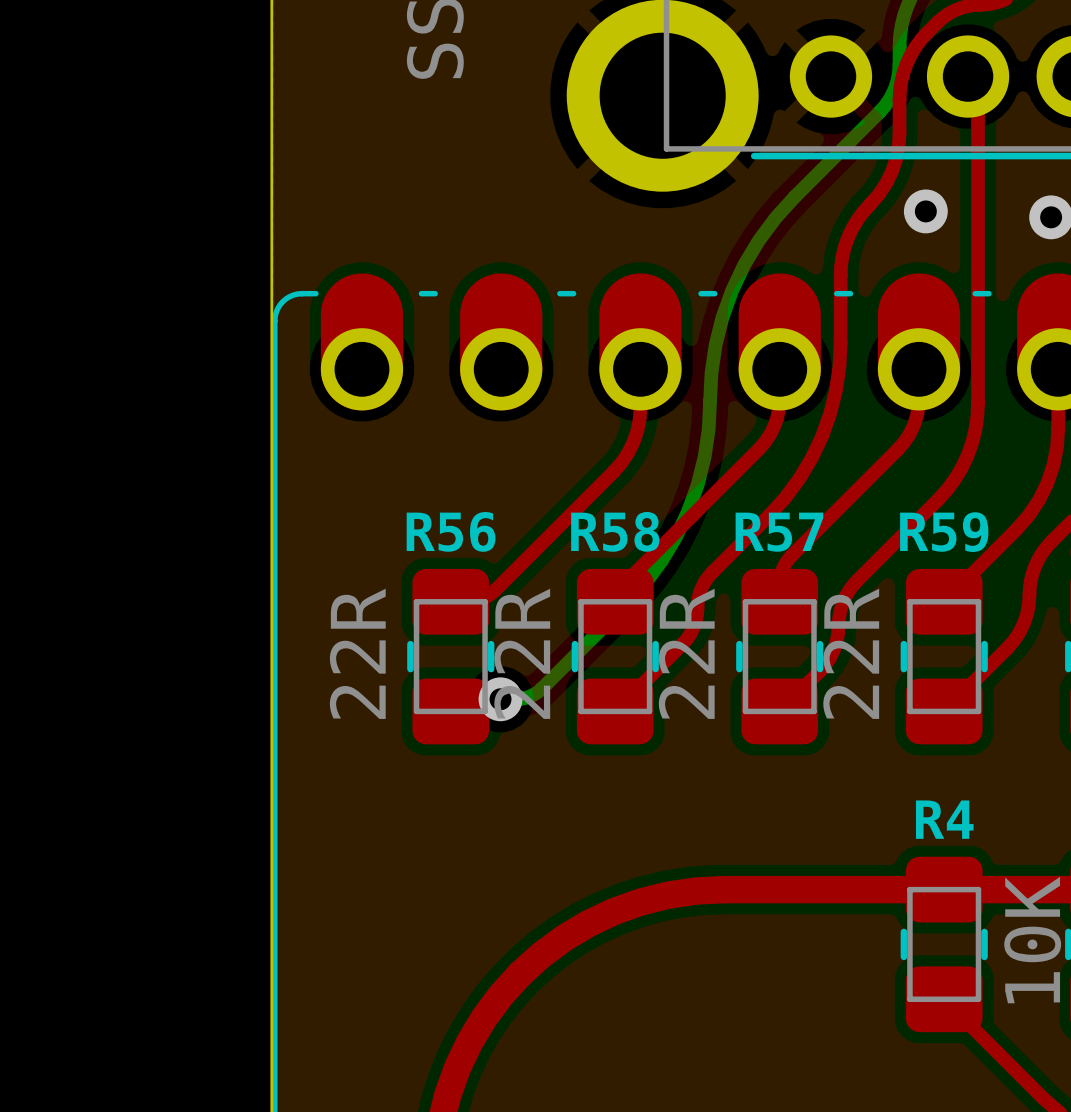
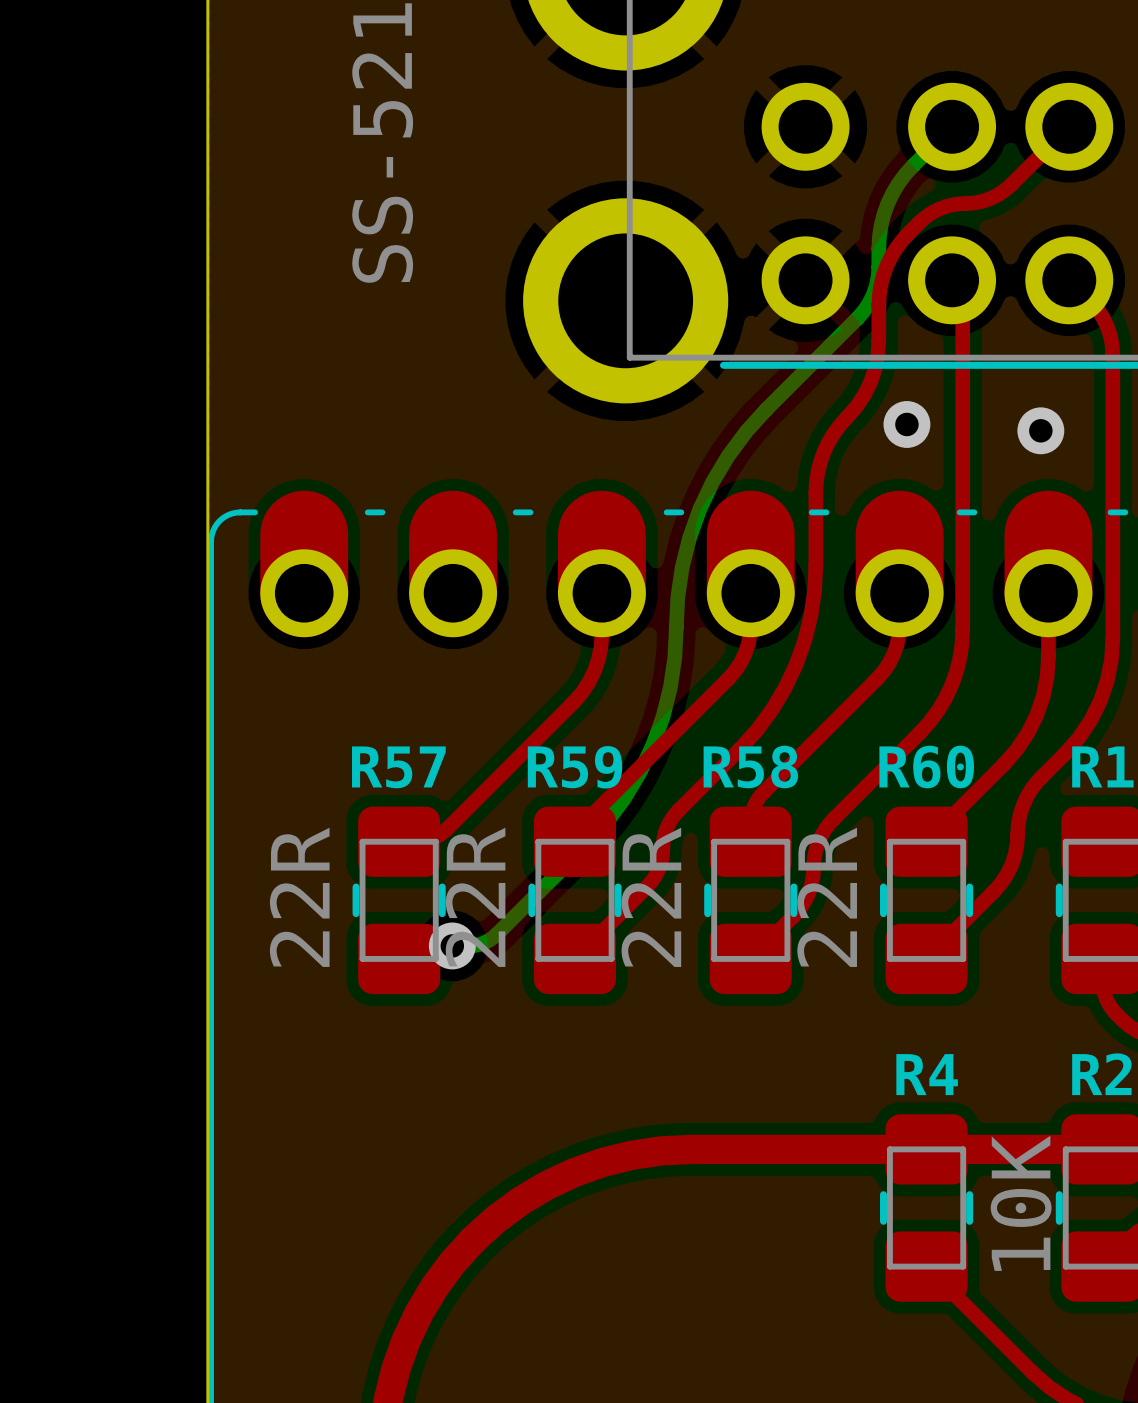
R56 name: R56 (451, 531) -> R57 (398, 767)
R58 name: R58 (615, 531) -> R59 (574, 767)
R57 name: R57 (779, 532) -> R58 (750, 766)
R59 name: R59 (944, 532) -> R60 (926, 767)

